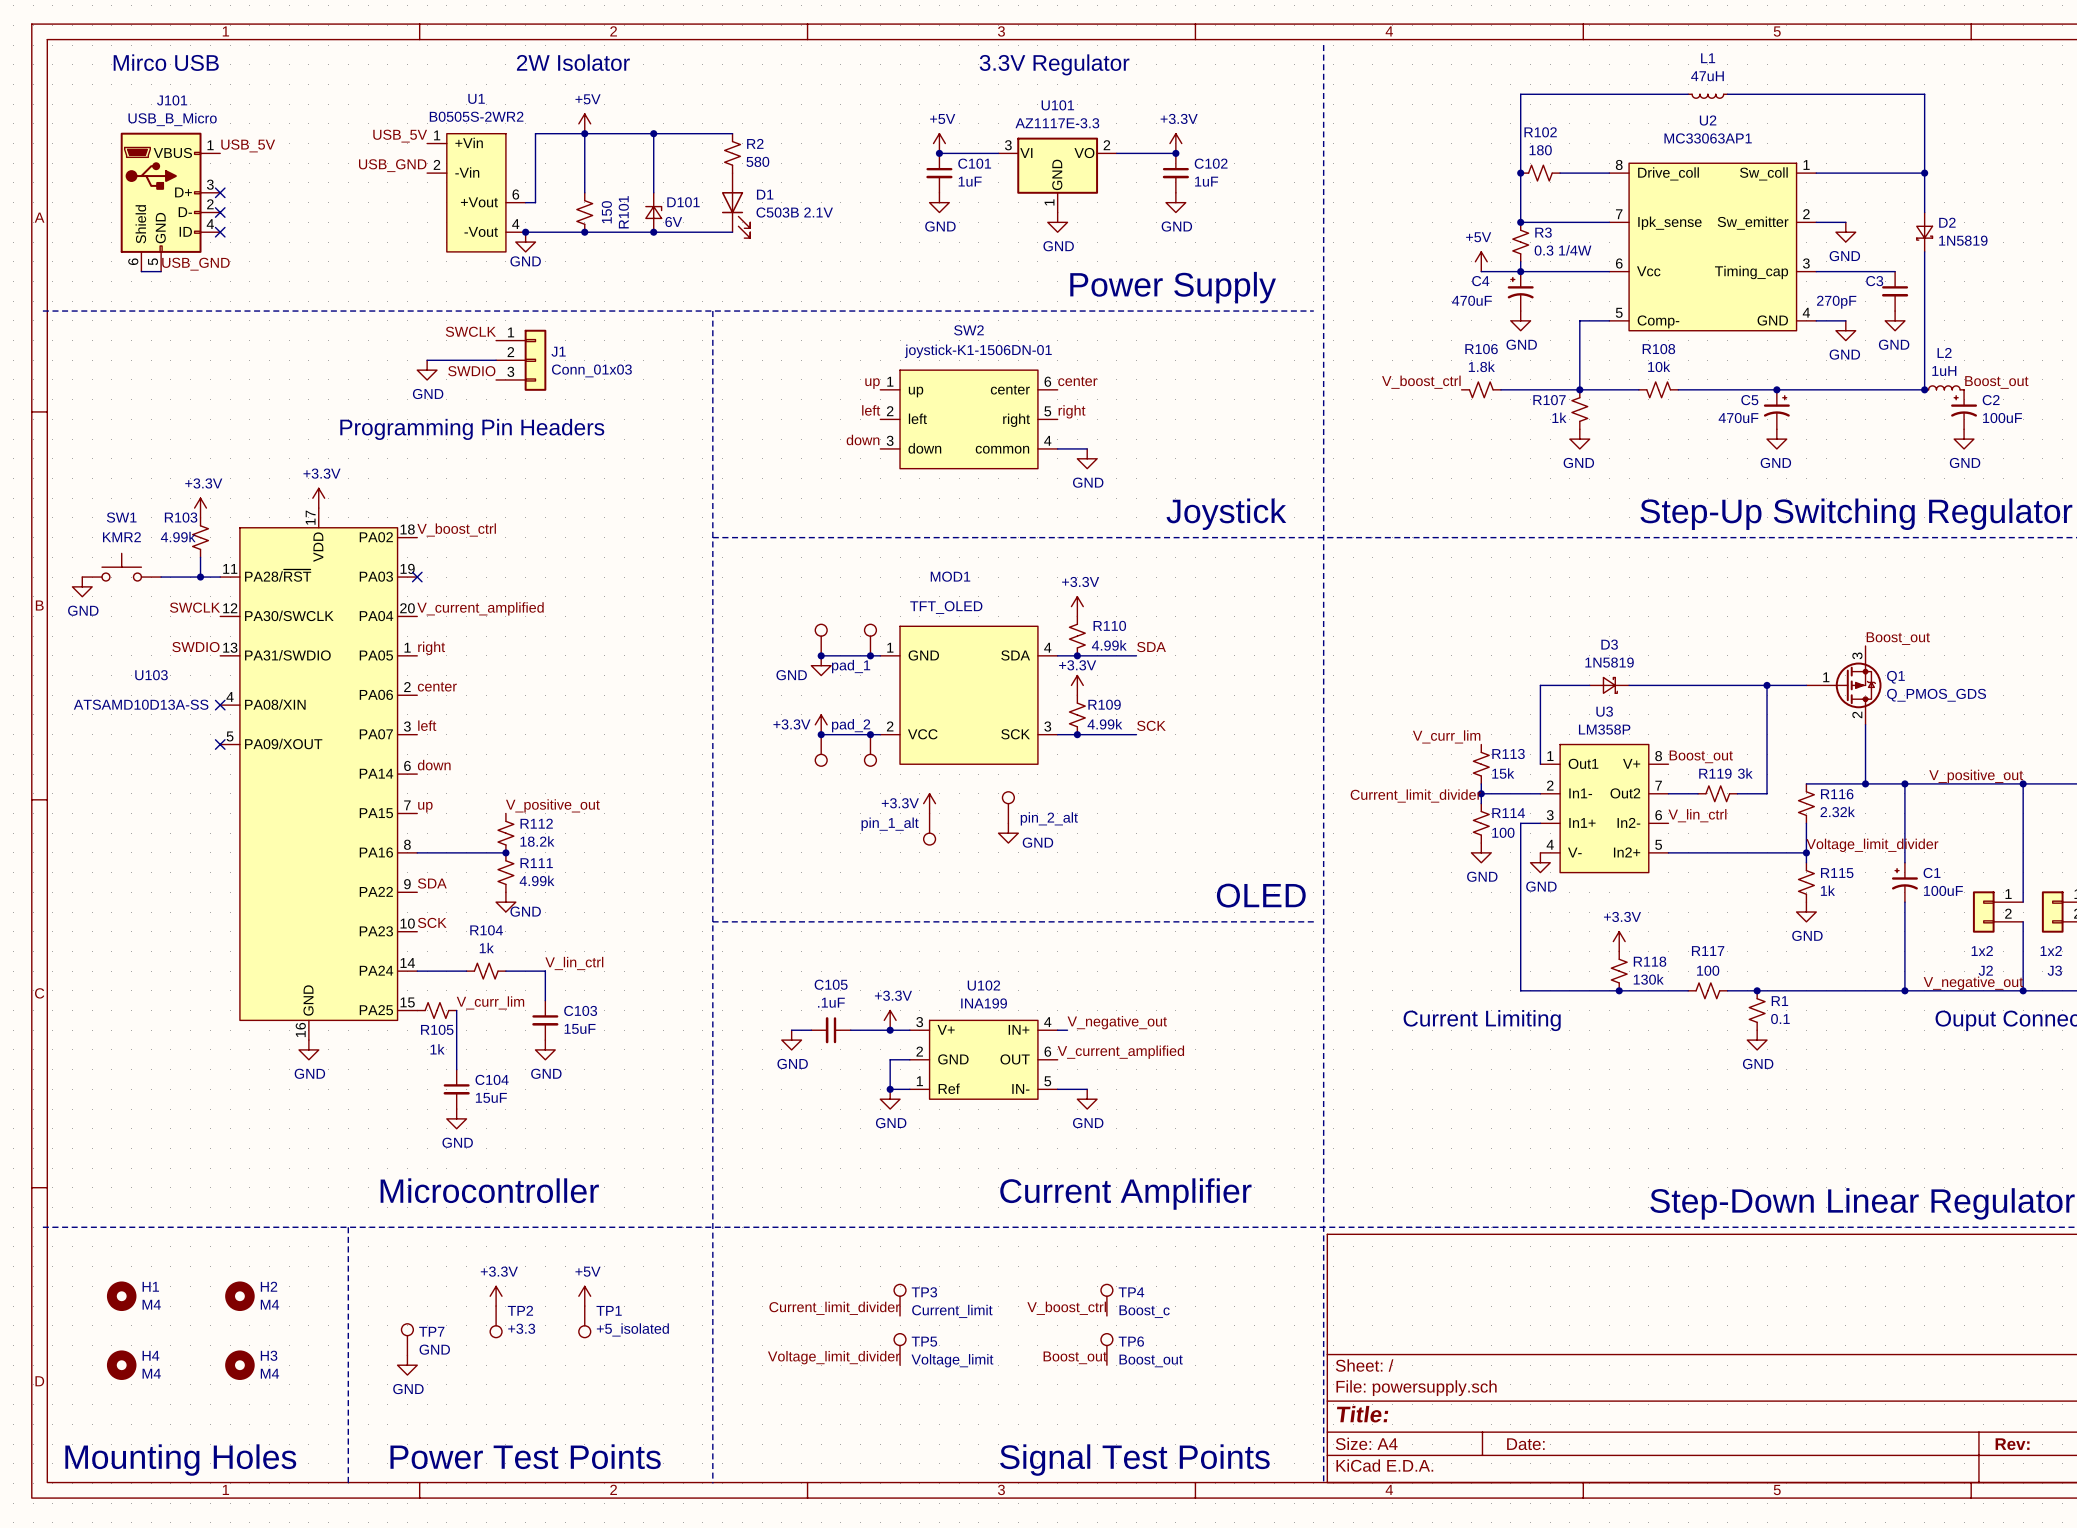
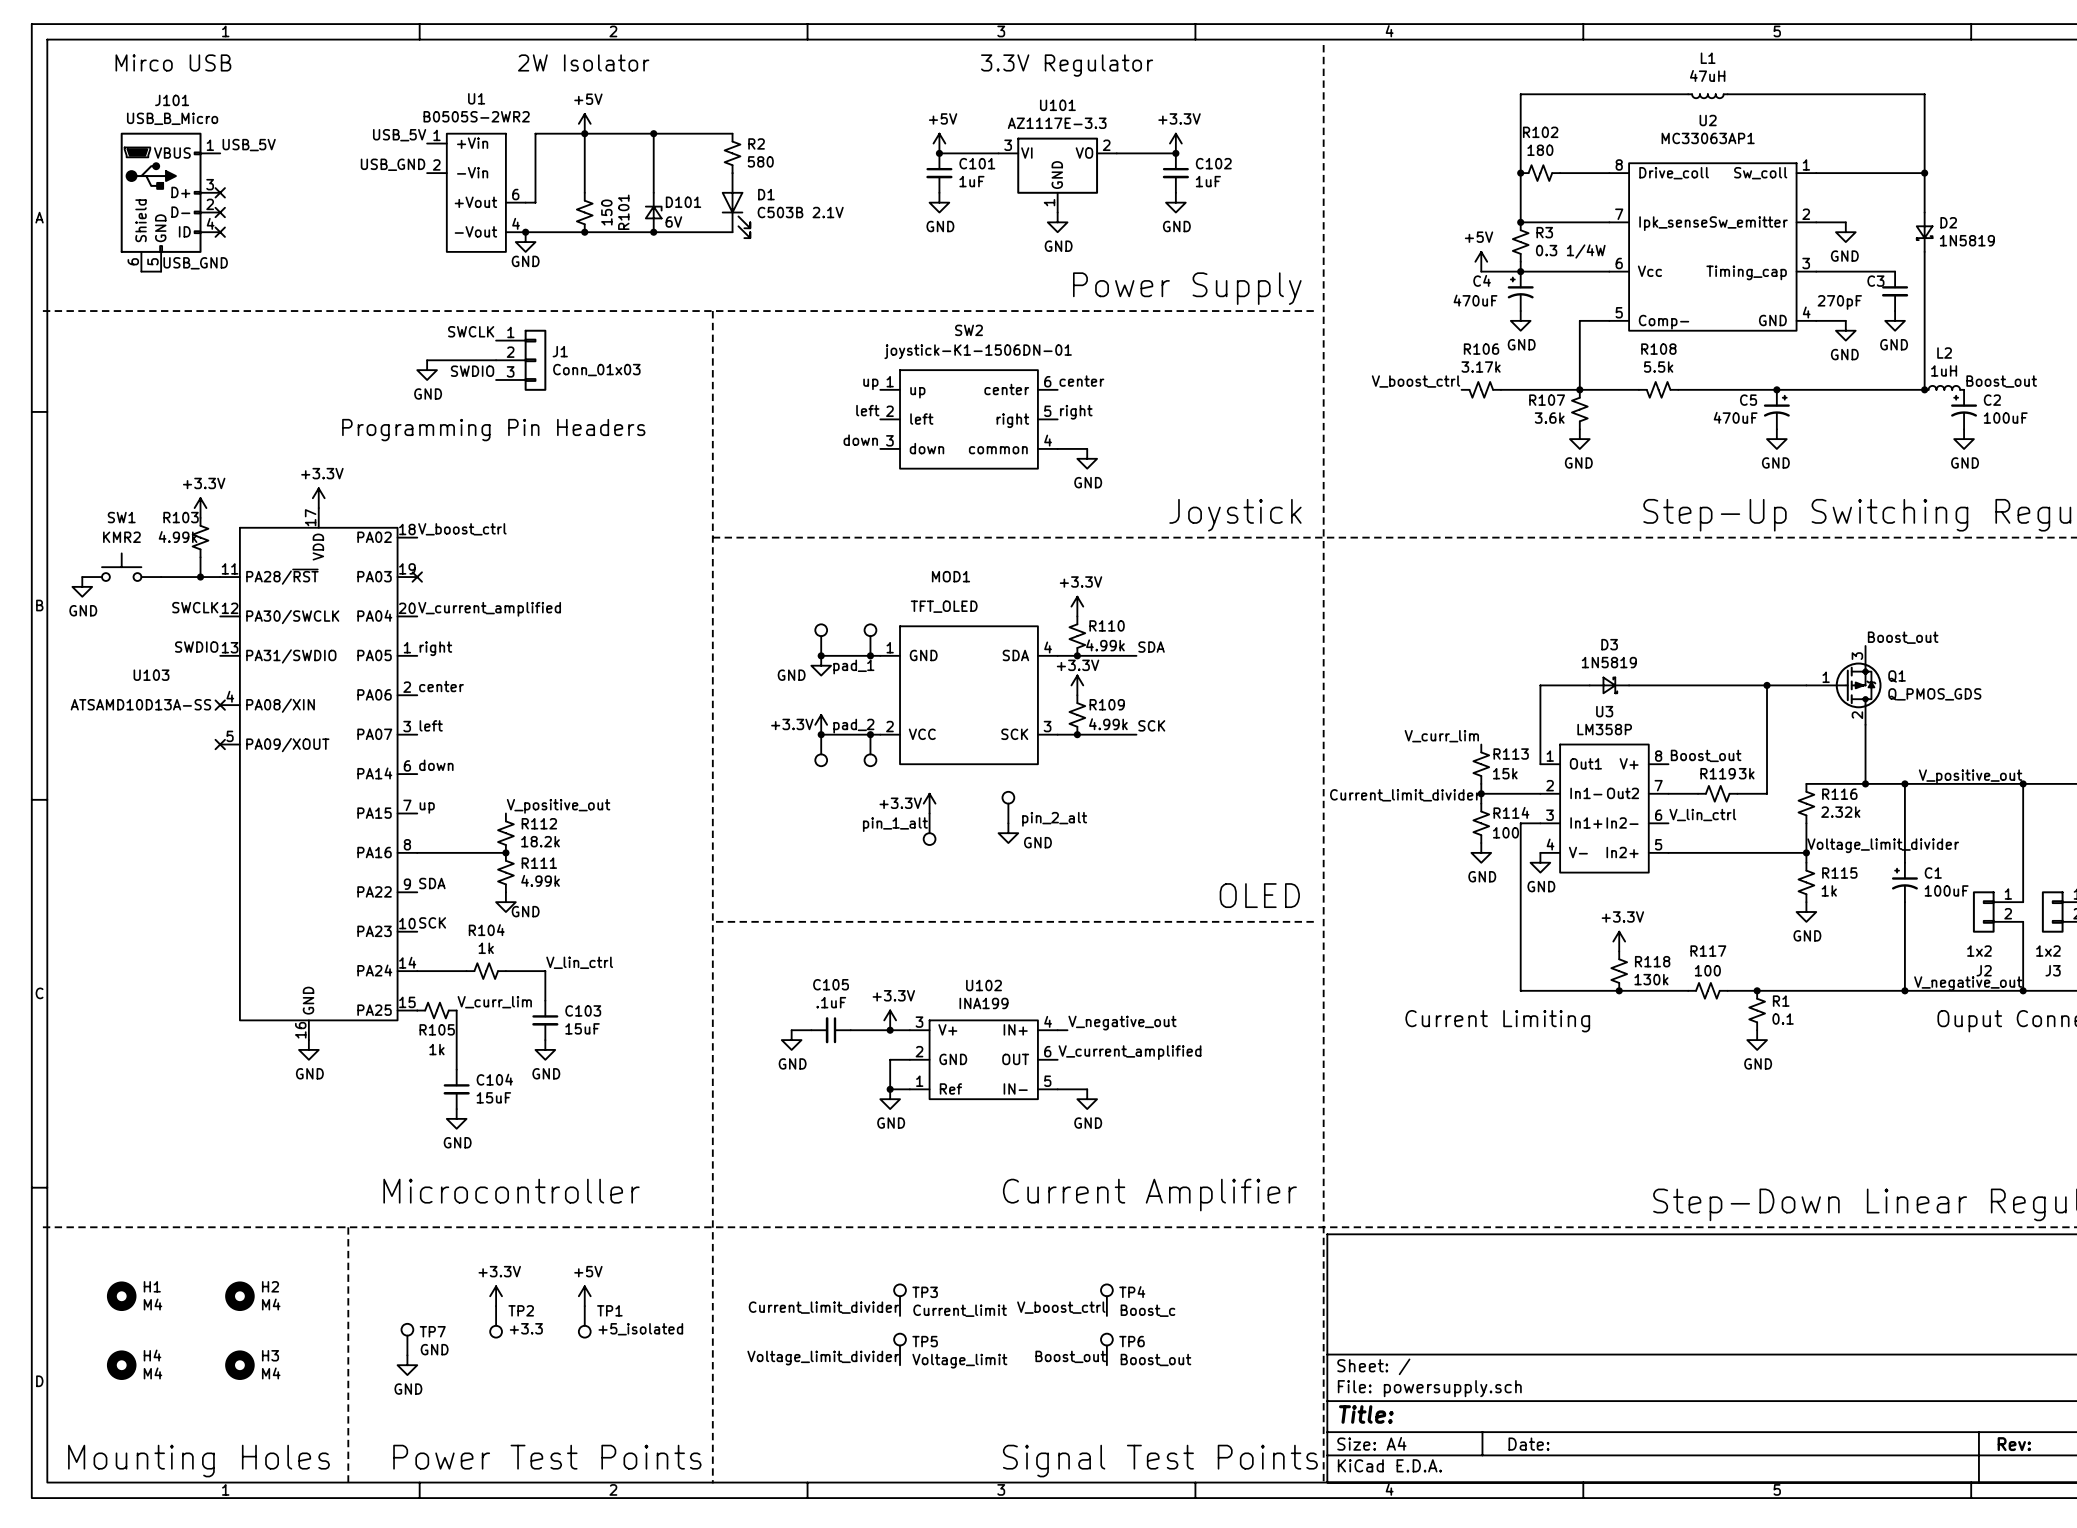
R106 value: 1.8k (1481, 366) -> 3.17k (1481, 367)
R108 value: 10k (1659, 366) -> 5.5k (1658, 367)
R107 value: 1k (1559, 417) -> 3.6k (1549, 418)

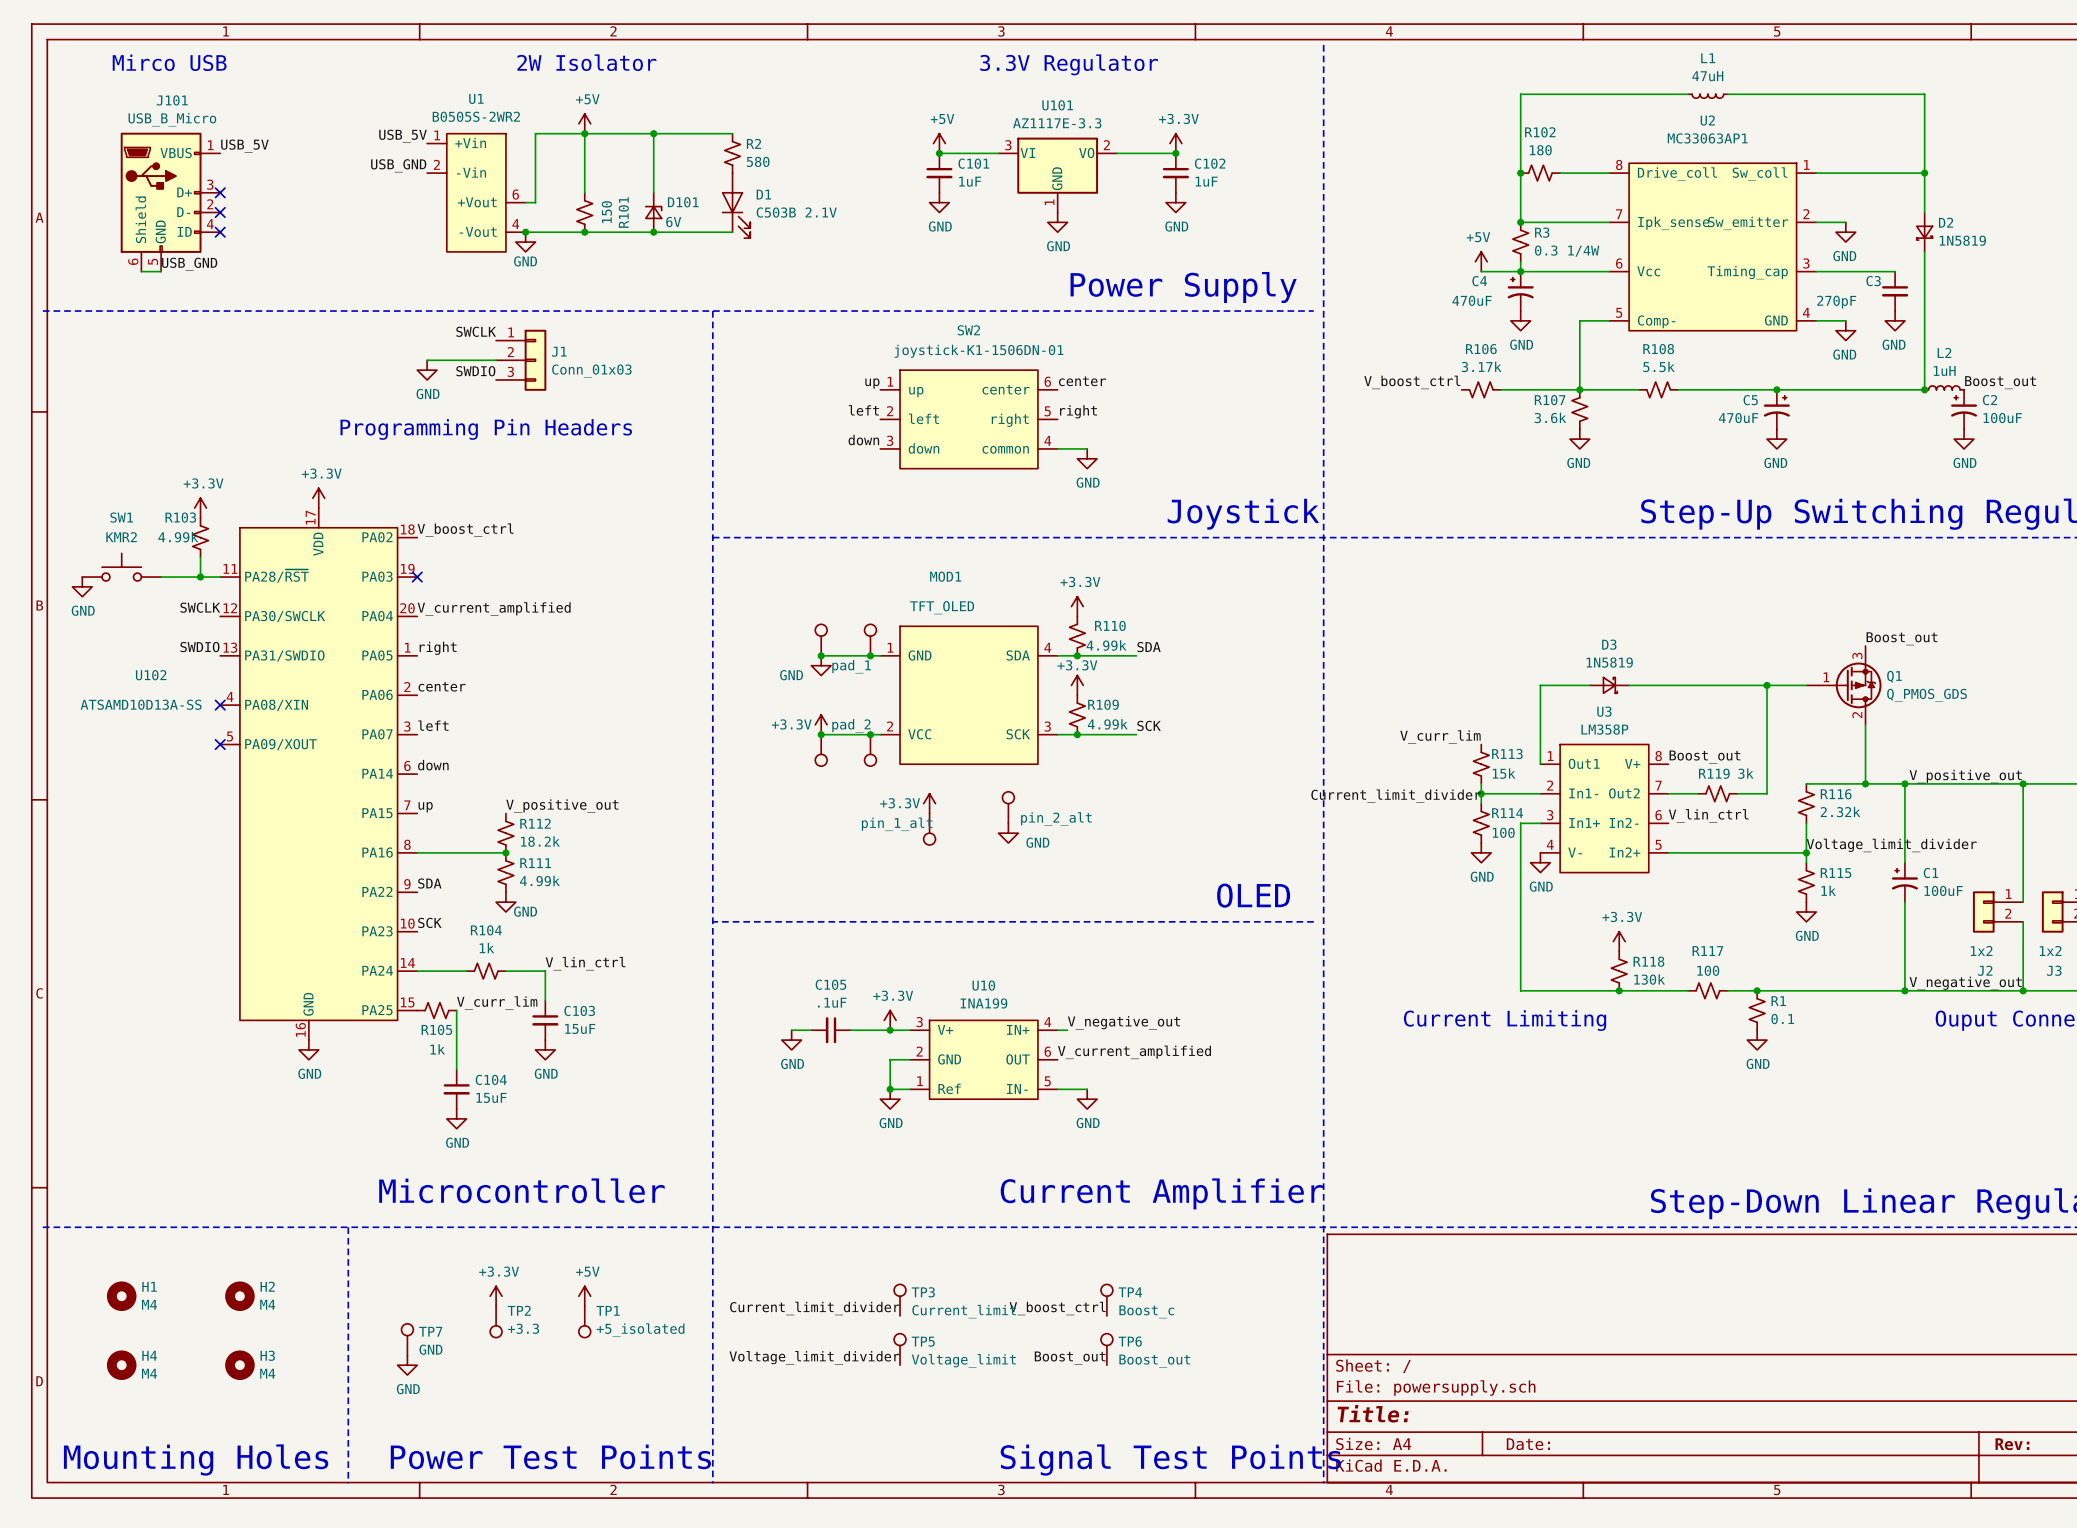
U103 name: U103 (151, 675) -> U102 (151, 675)
U102 name: U102 (984, 985) -> U10 (983, 985)

